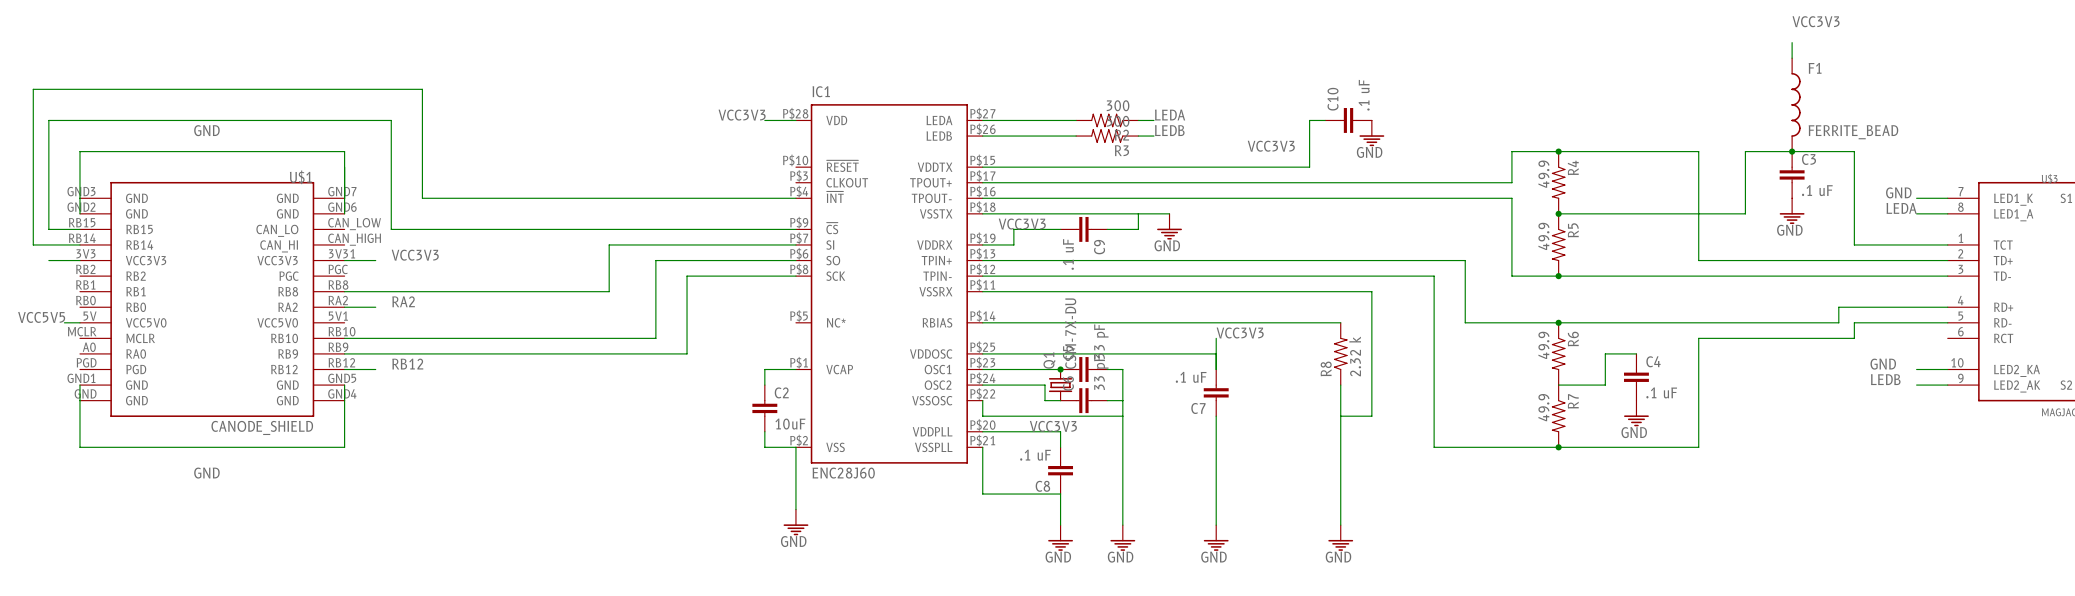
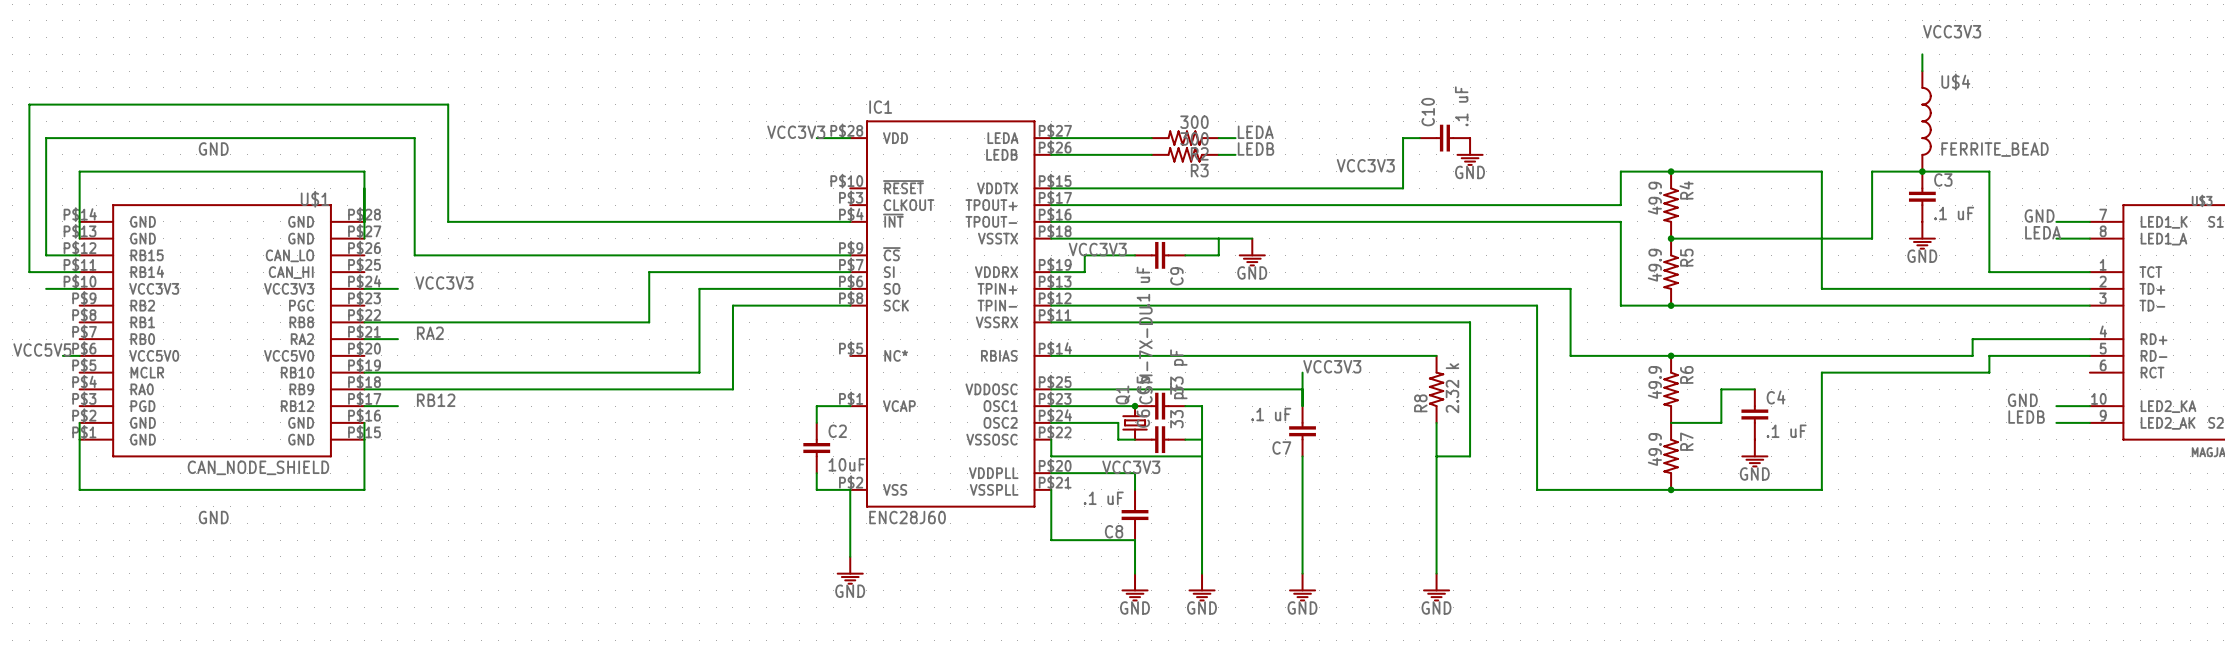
F1 name: F1 (1815, 68) -> U$4 (1955, 81)
U$1 symbol: [79, 181, 345, 417] -> [79, 204, 365, 458]
U$1 value: CANODE_SHIELD (262, 427) -> CAN_NODE_SHIELD (258, 467)

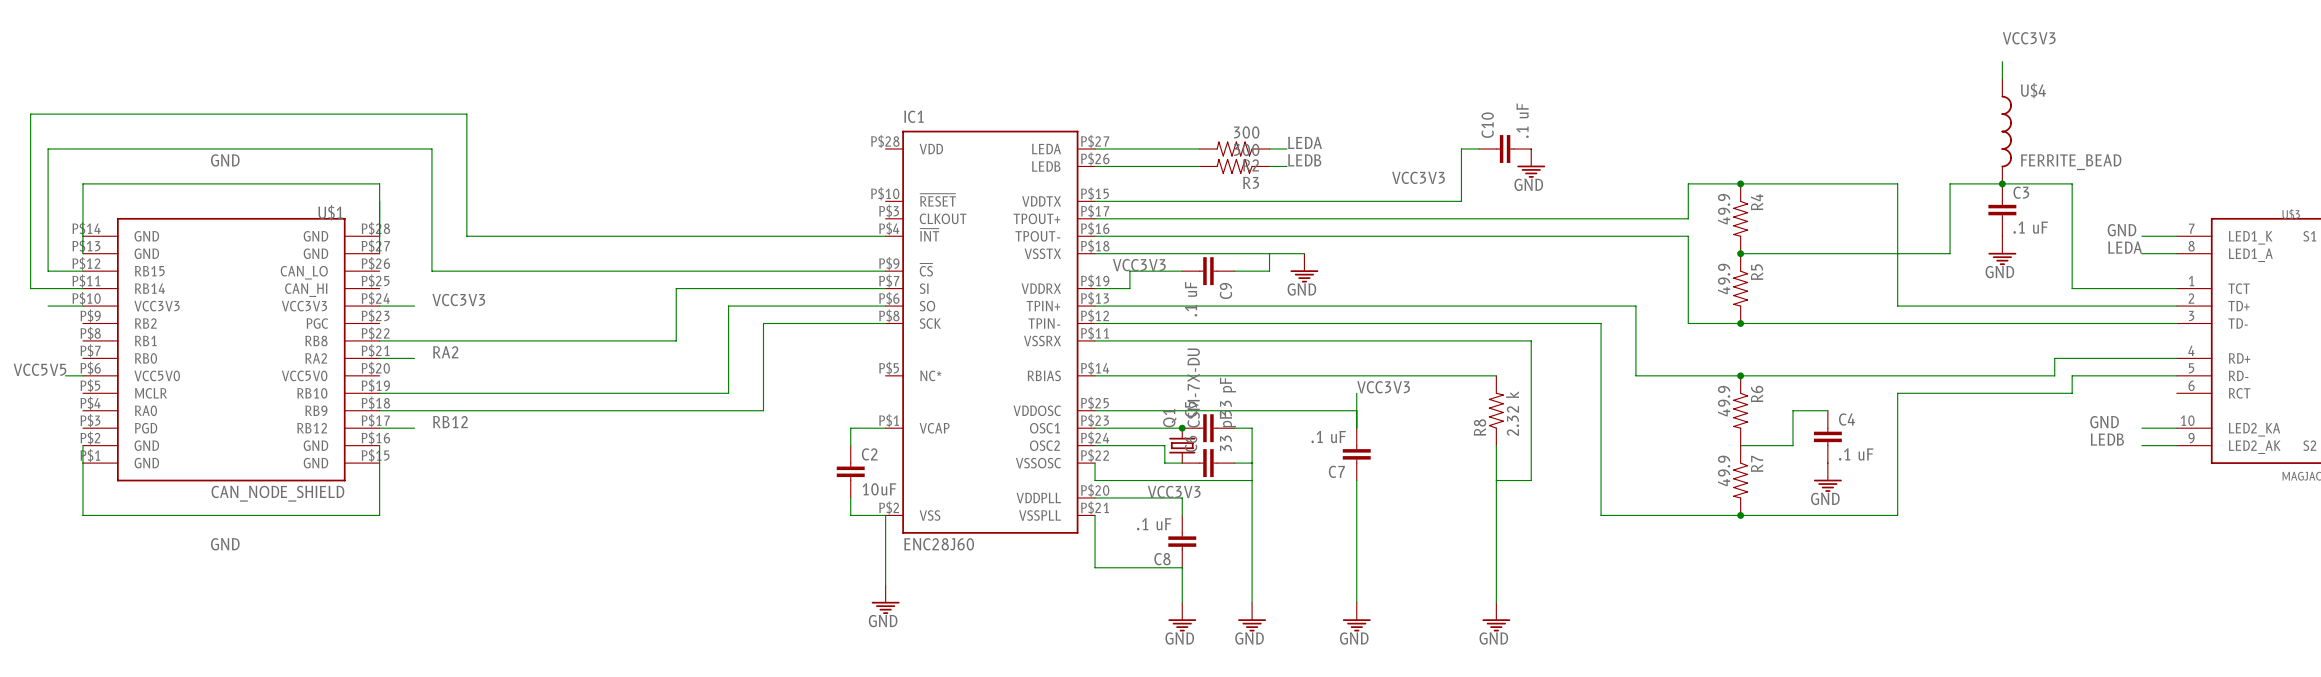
label: VCC3V3 (796, 132) -> none
wire: (816, 138) (850, 138) -> none

